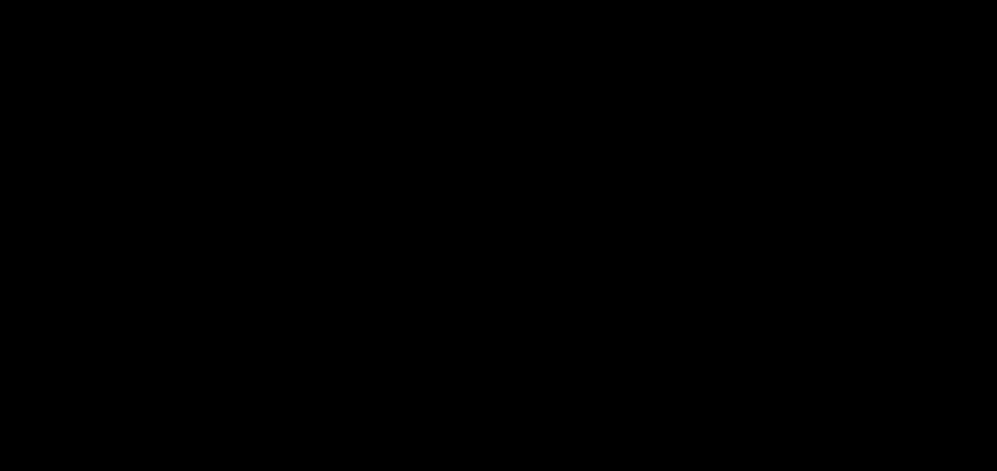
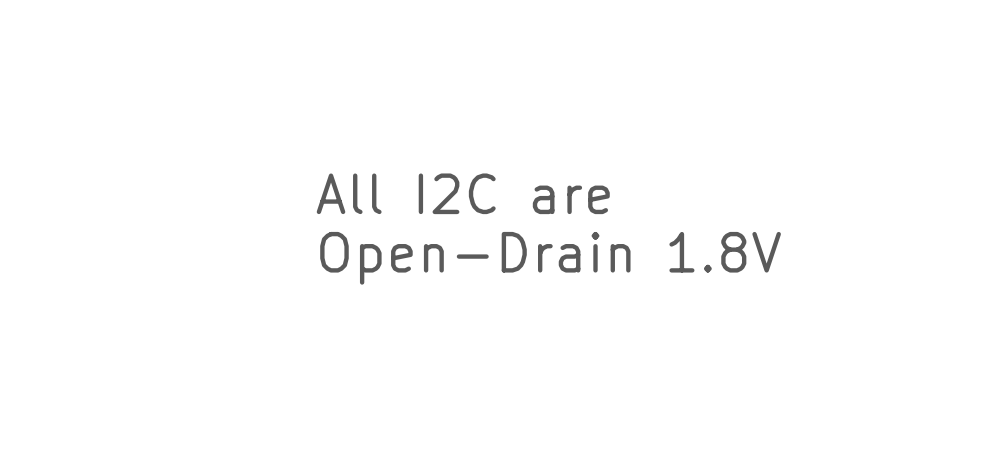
text: none -> All I2C are (463, 193)
text: none -> Open-Drain 1.8V (550, 258)

